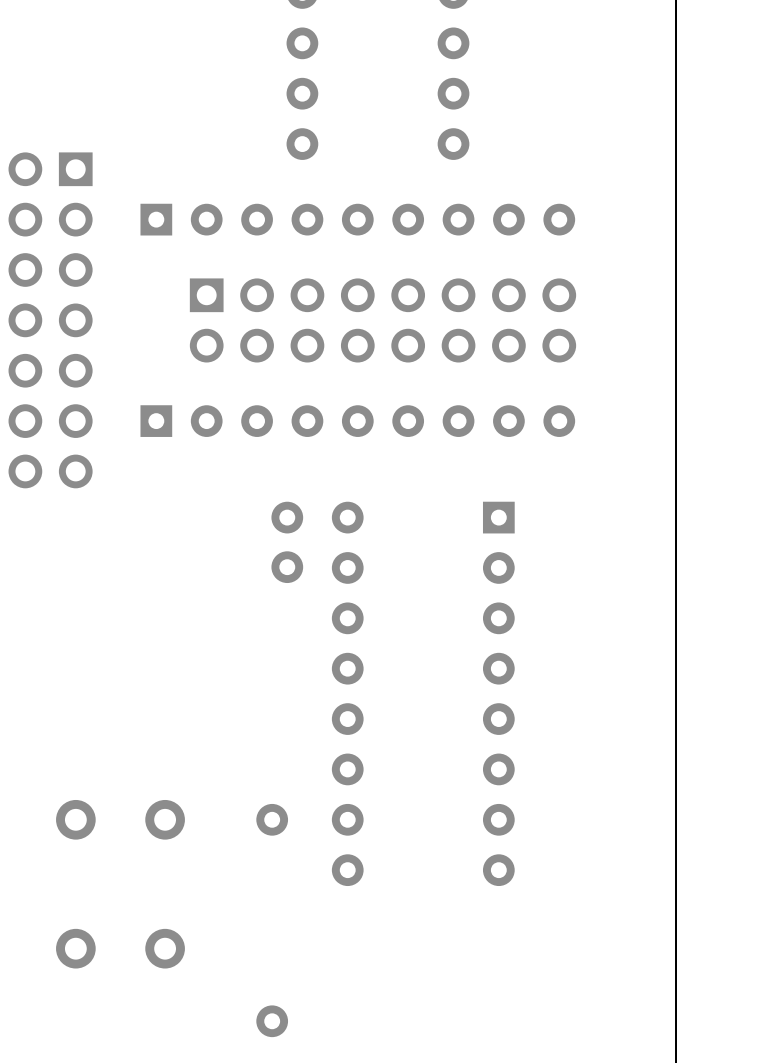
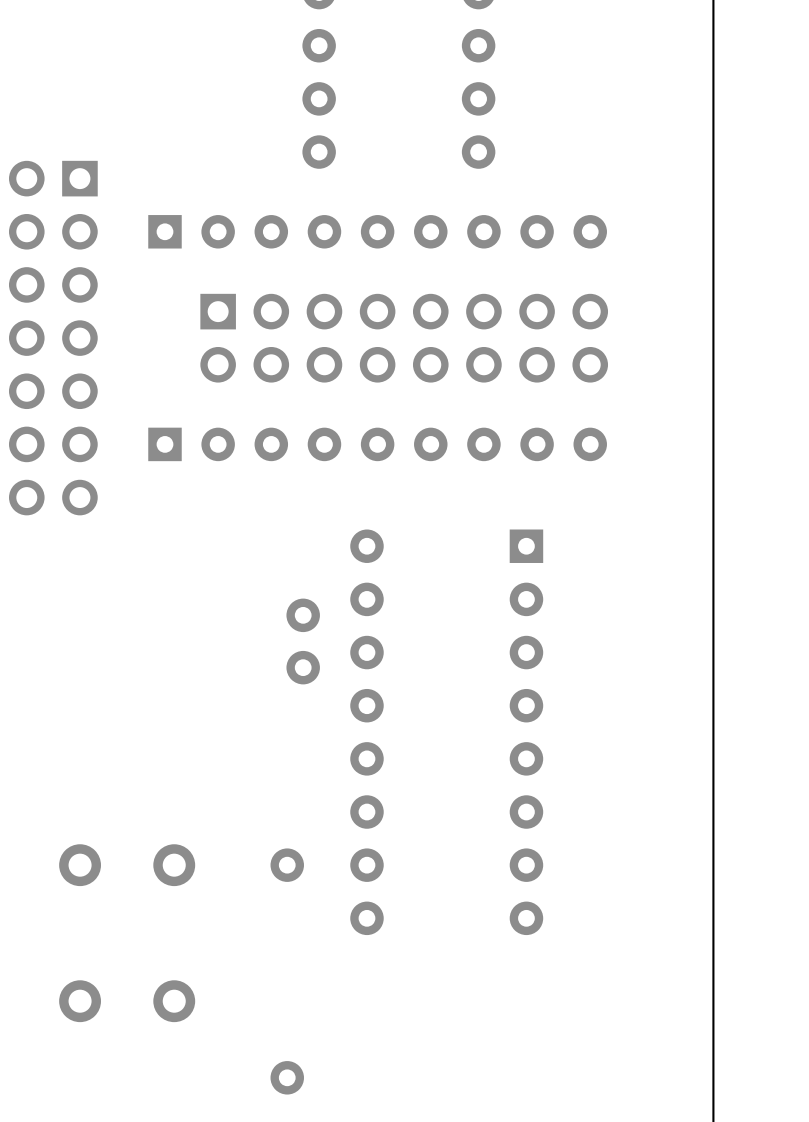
part position: (287, 542) -> (303, 641)

